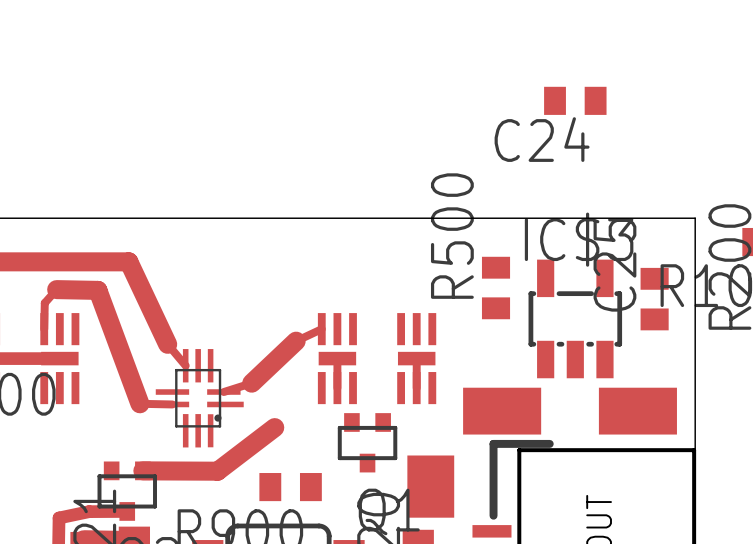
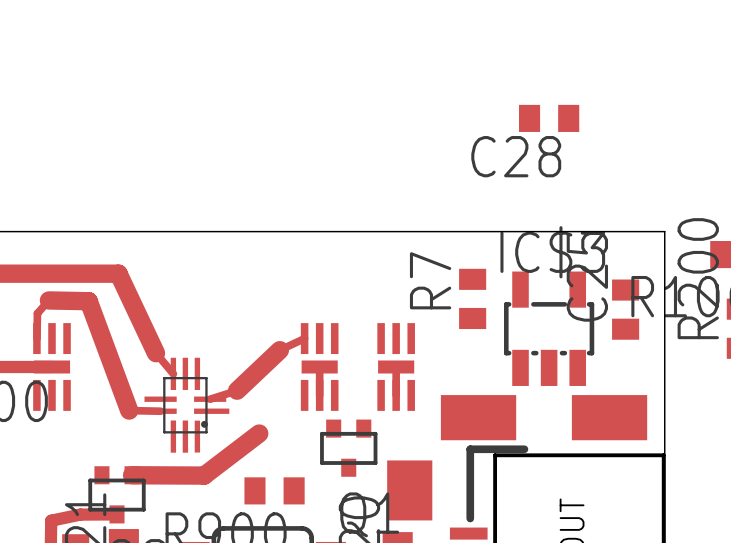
C24 name: C24 (542, 139) -> C28 (516, 156)
R500 name: R500 (452, 236) -> R7 (430, 280)

